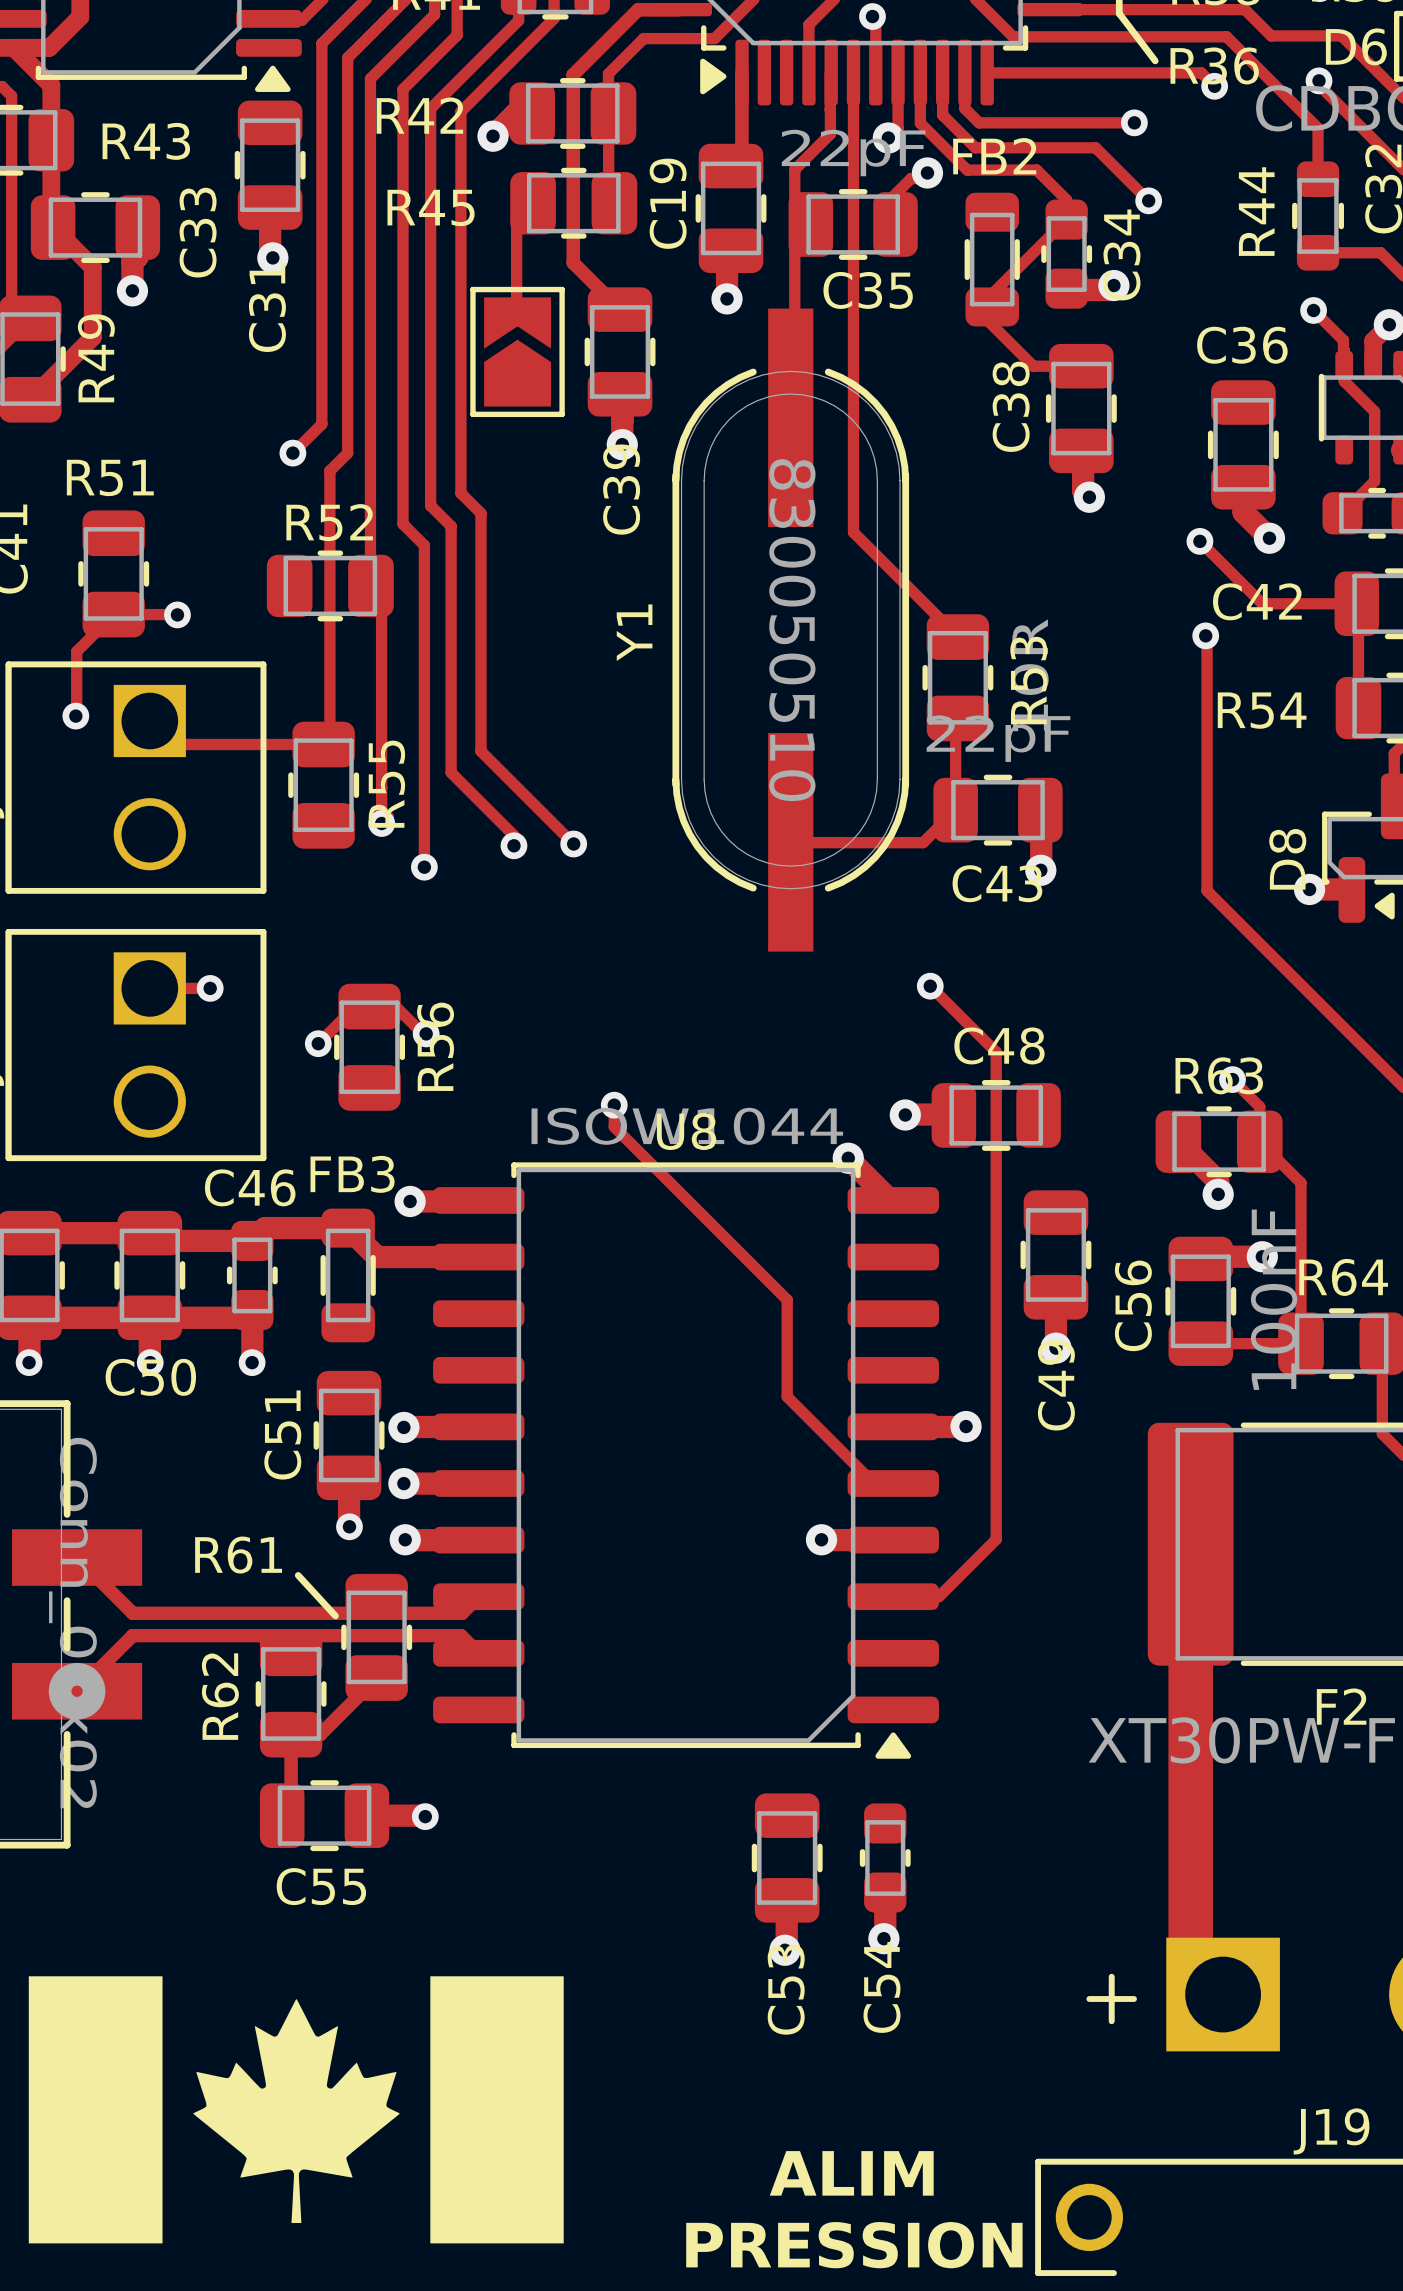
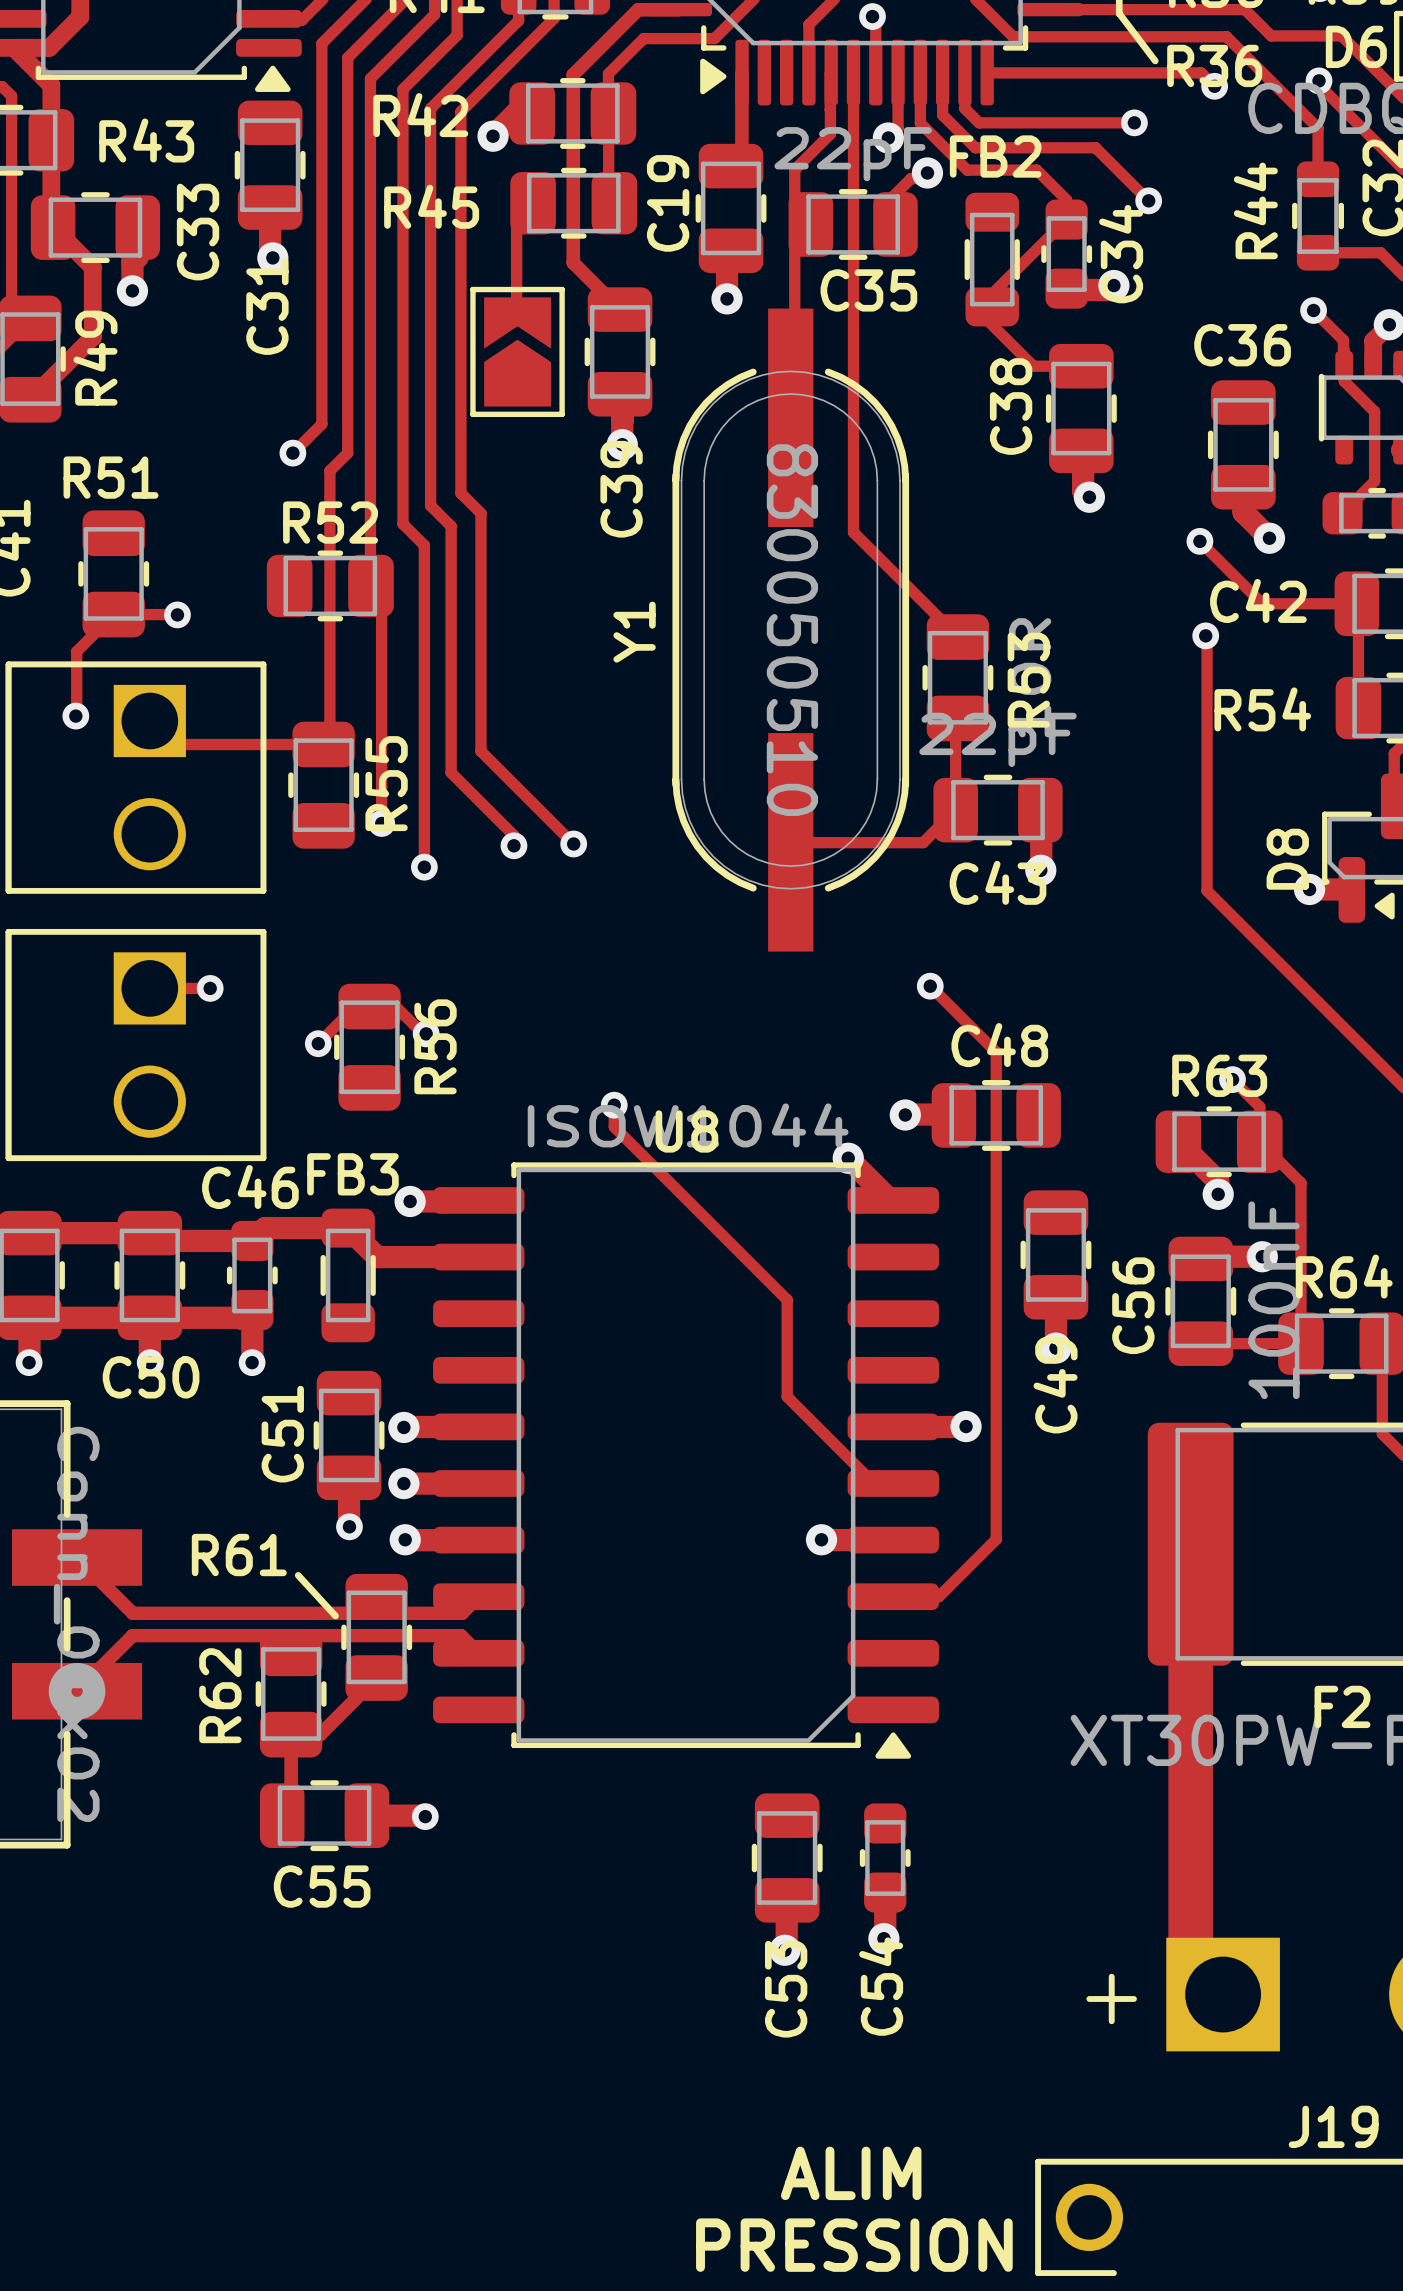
drawing: [28, 1976, 564, 2244] -> none

